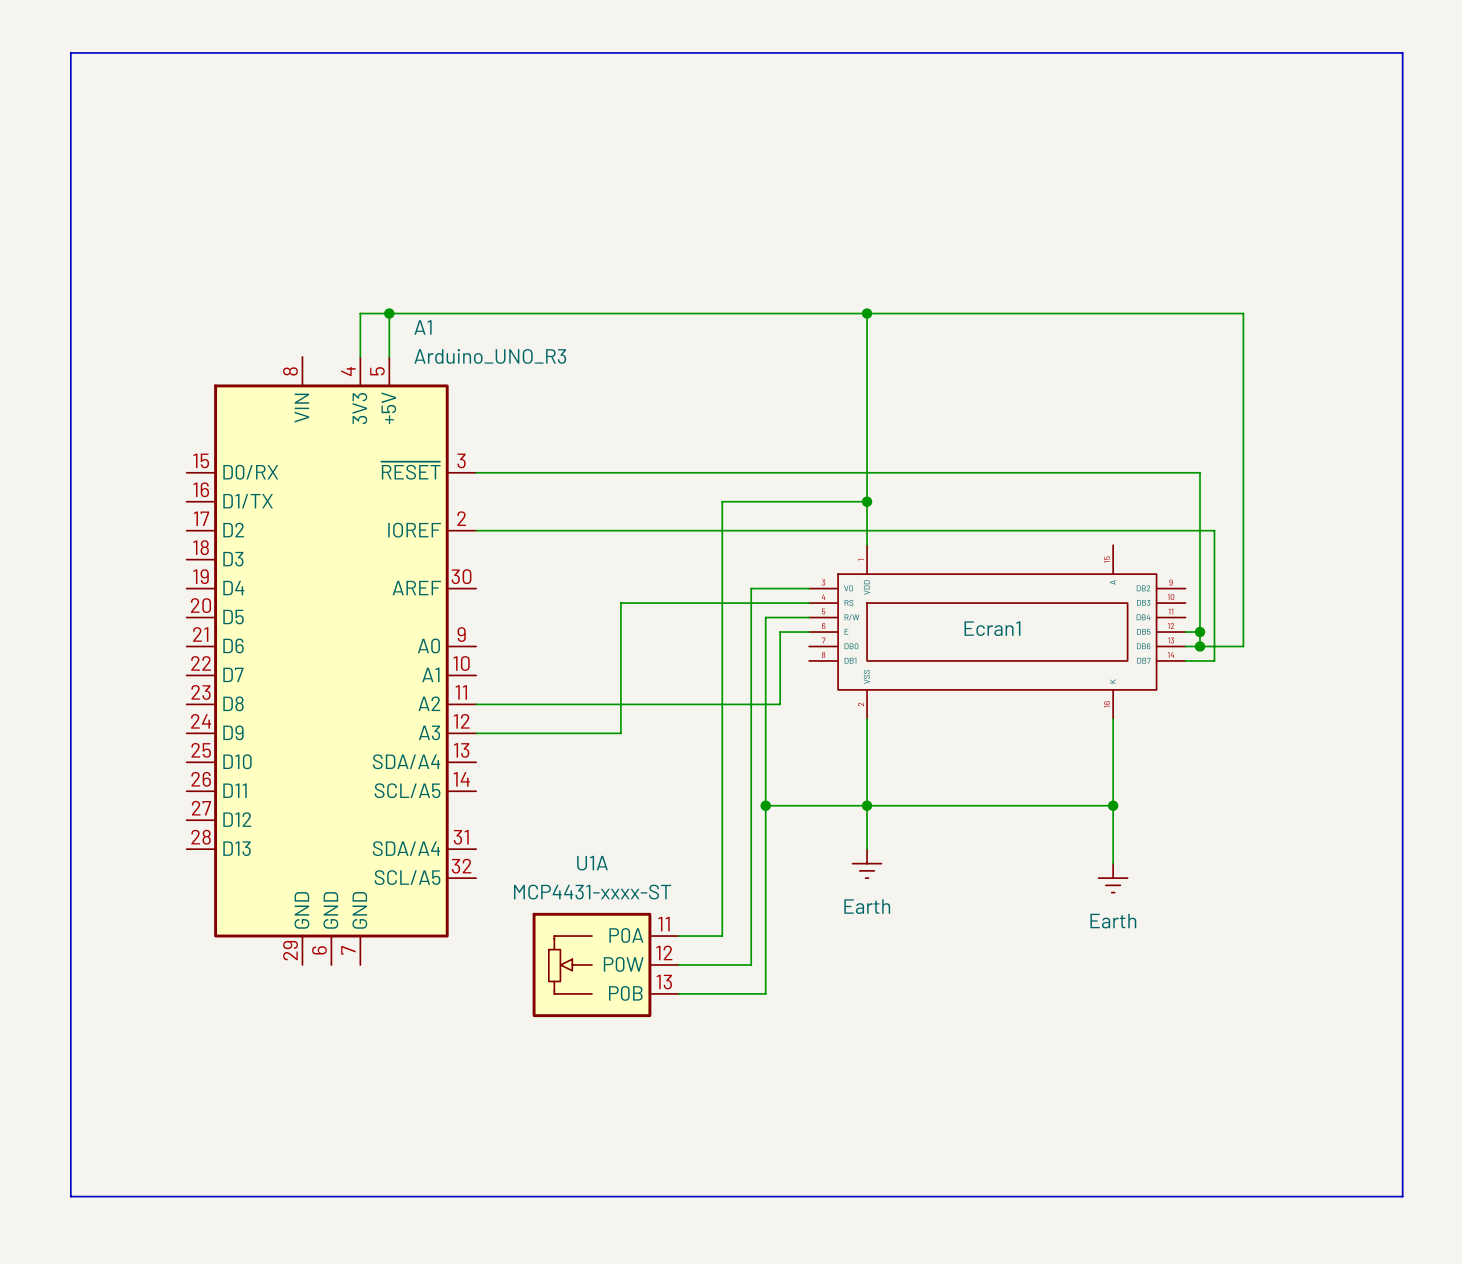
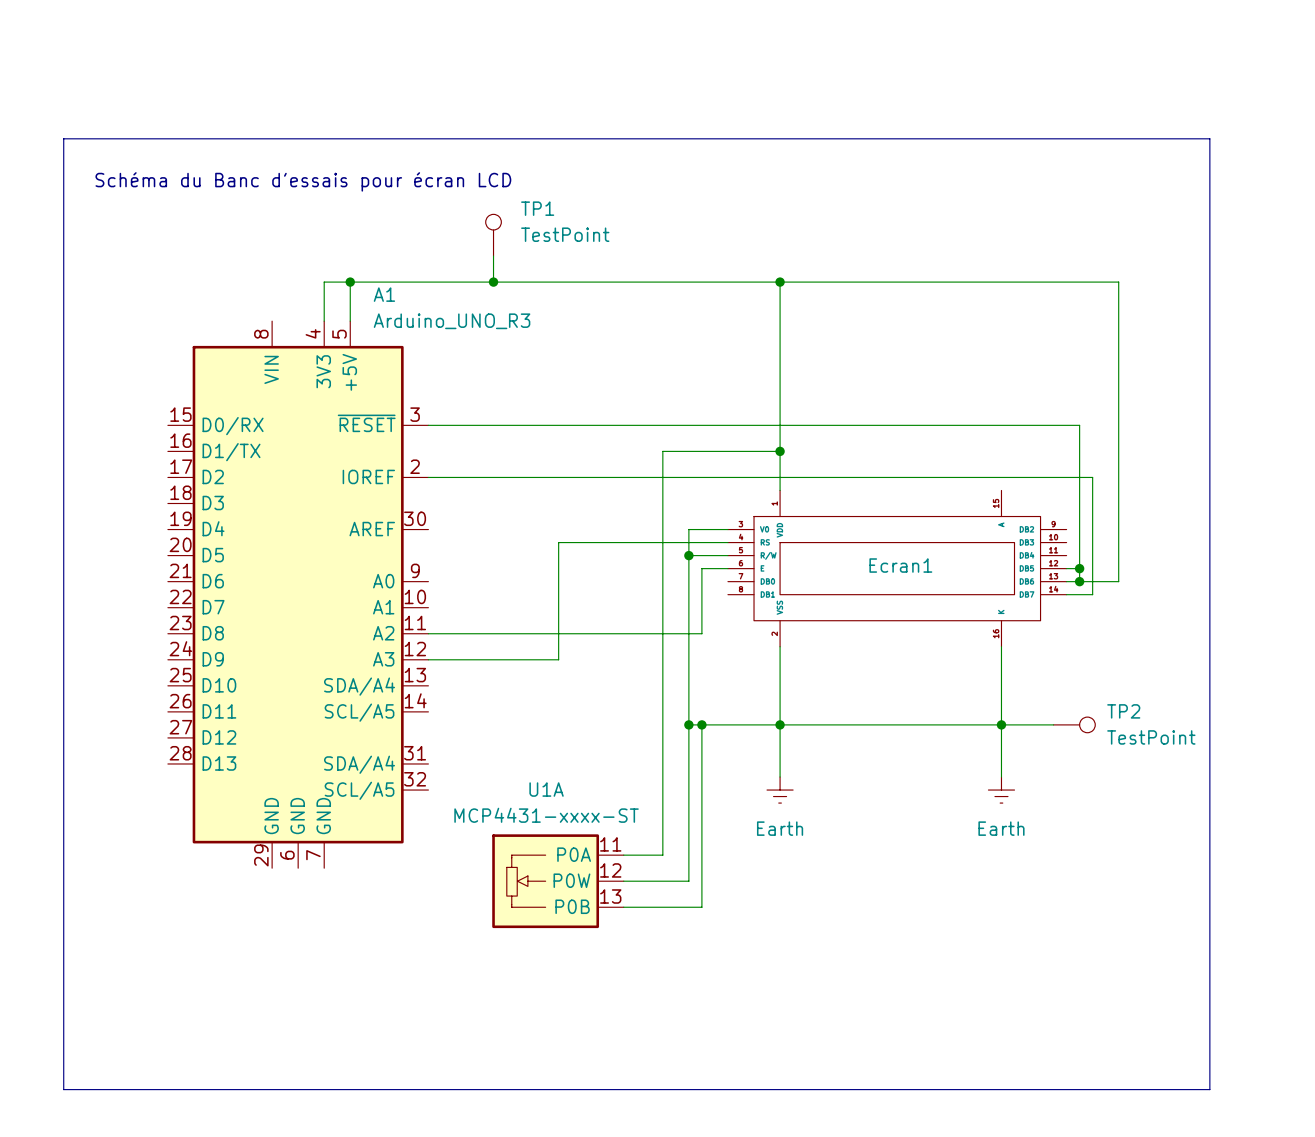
line: (70, 154) (70, 52) (1402, 52) (1402, 1196) (70, 1196) -> (63, 138) (1209, 138) (1209, 1089) (63, 1089) (63, 1076)
text: none -> Schéma du Banc d'essais pour écran LCD (303, 181)
TP1: none -> TestPoint (493, 235)
wire: none -> (493, 256) (493, 282)
junction: none -> (493, 282)
wire: (736, 501) (722, 501) (722, 936) (678, 936) -> (662, 451) (662, 855) (623, 855)
wire: (765, 588) (751, 588) (751, 964) (678, 964) -> (688, 529) (688, 555)
junction: none -> (688, 555)
wire: none -> (701, 724) (701, 907) (623, 907)
junction: none -> (701, 724)
wire: none -> (1001, 724) (1053, 724)
TP2: none -> TestPoint (1074, 724)
power symbol position: Earth (867, 863) -> Earth (780, 790)
U1A position: (605, 964) -> (557, 881)
wire: (765, 979) (765, 993) (678, 993) -> (688, 881) (623, 881)

